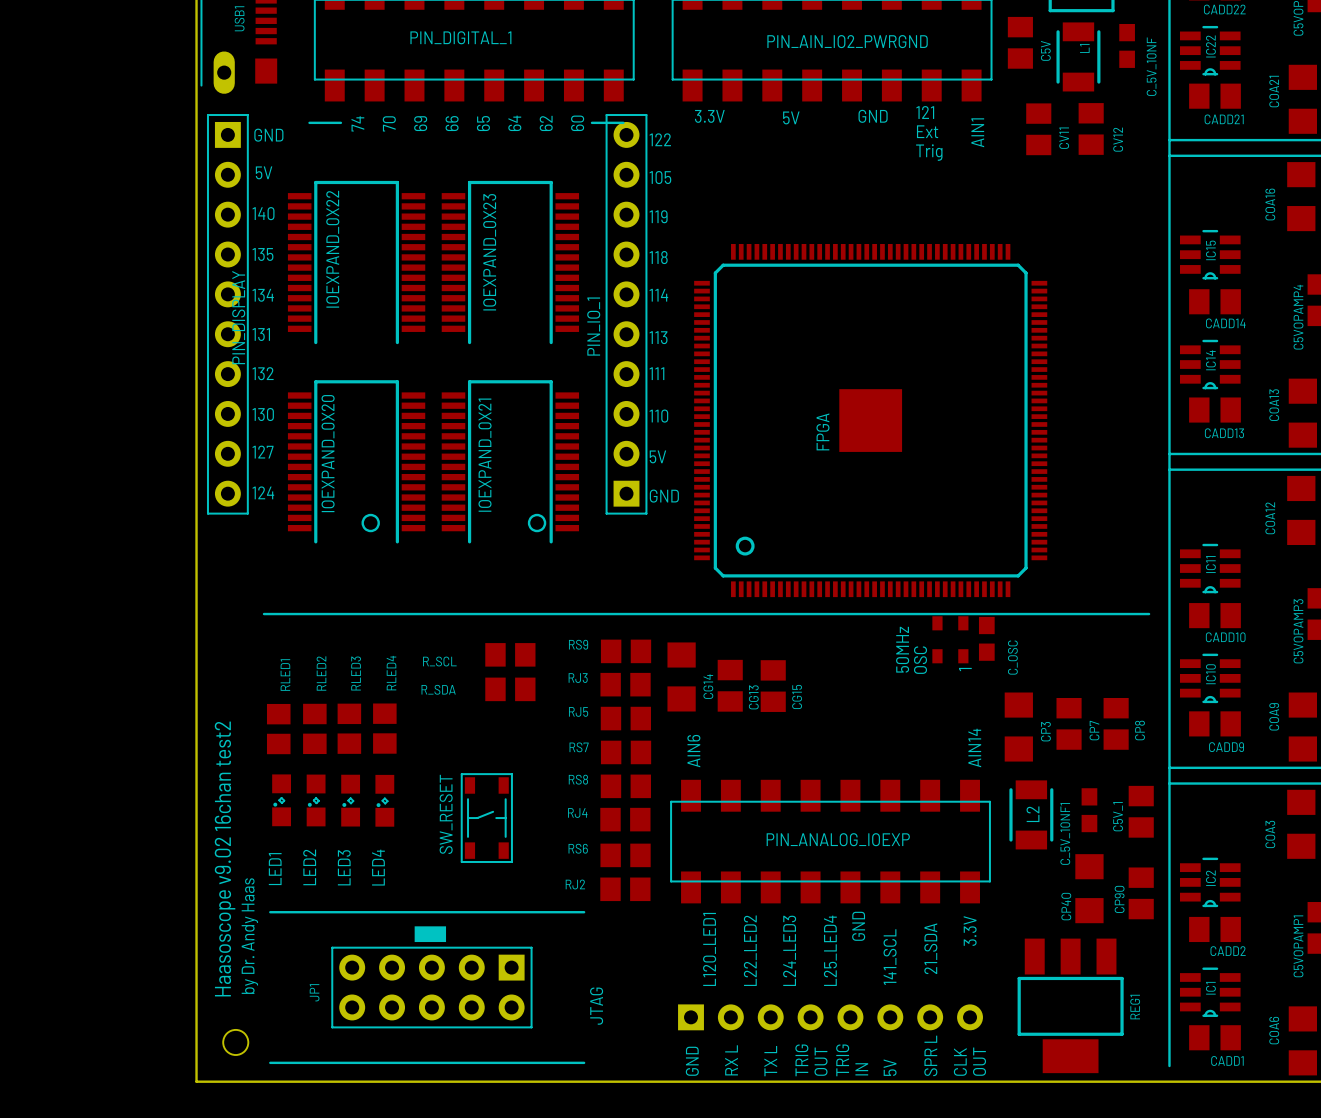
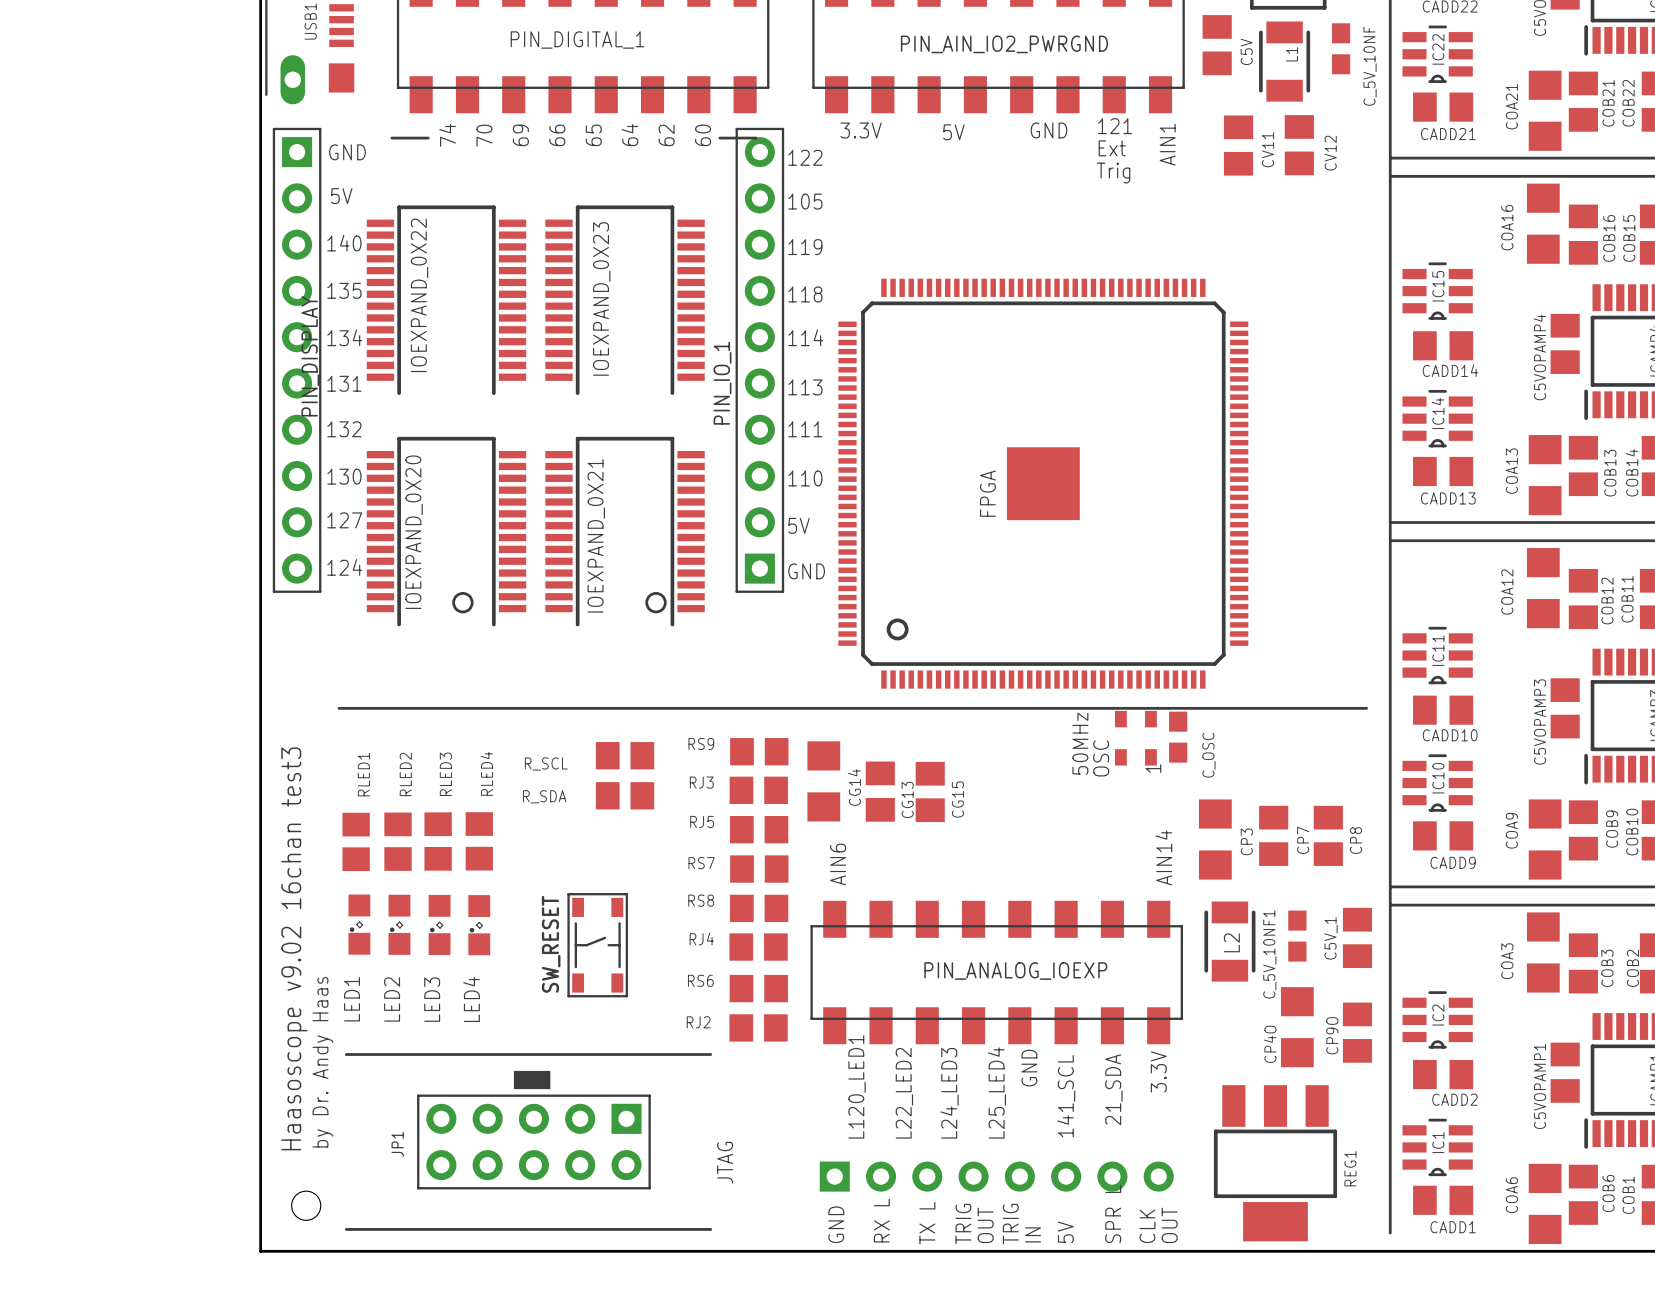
text: Haasoscope v9.02 16chan test2 (225, 859) -> Haasoscope v9.02 16chan test3 (294, 948)

